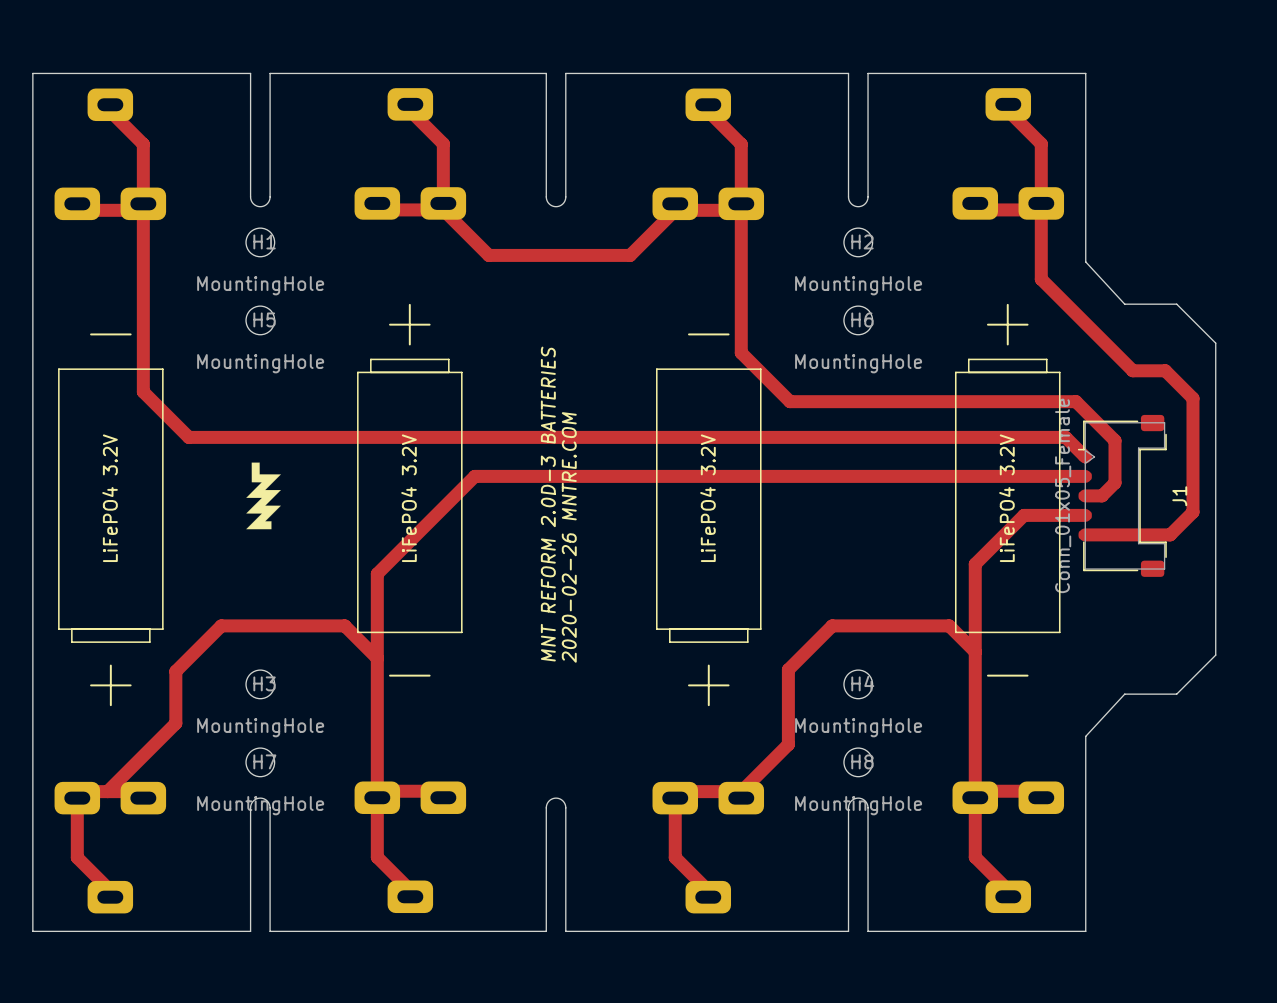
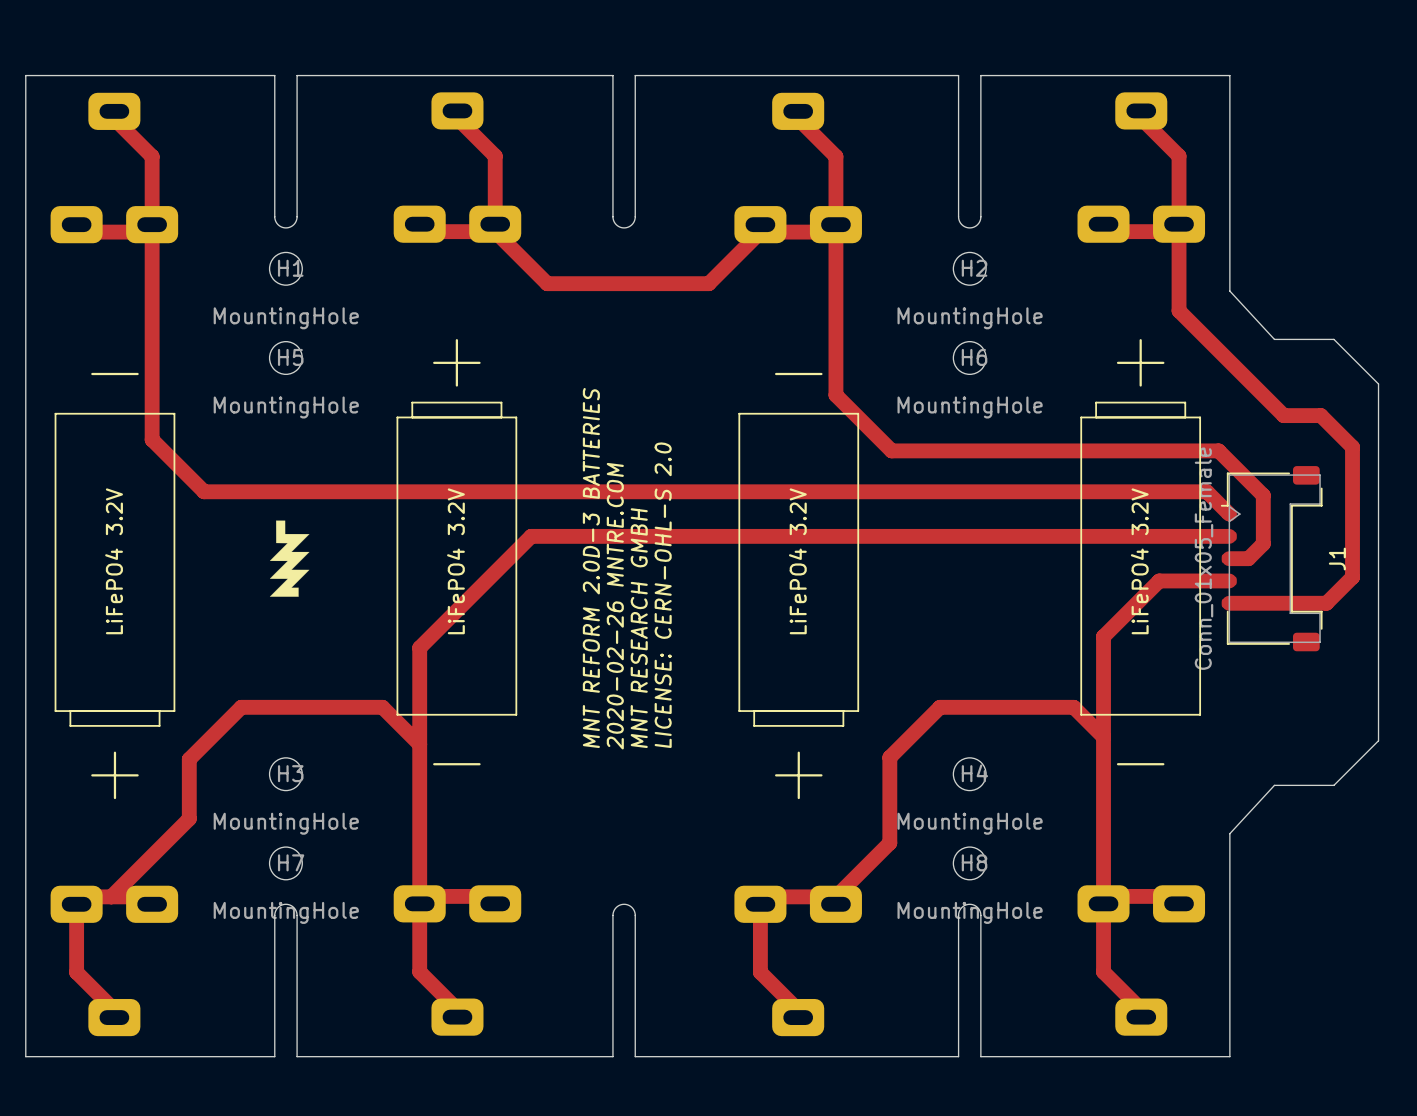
text: none -> MNT REFORM 2.0D-3 BATTERIES (591, 568)
text: MNT REFORM 2.0D-3 BATTERIES (548, 504) -> 2020-02-26 MNTRE.COM (615, 606)
text: none -> LICENSE: CERN-OHL-S 2.0 (663, 595)
text: 2020-02-26 MNTRE.COM (569, 537) -> MNT RESEARCH GMBH (639, 628)

